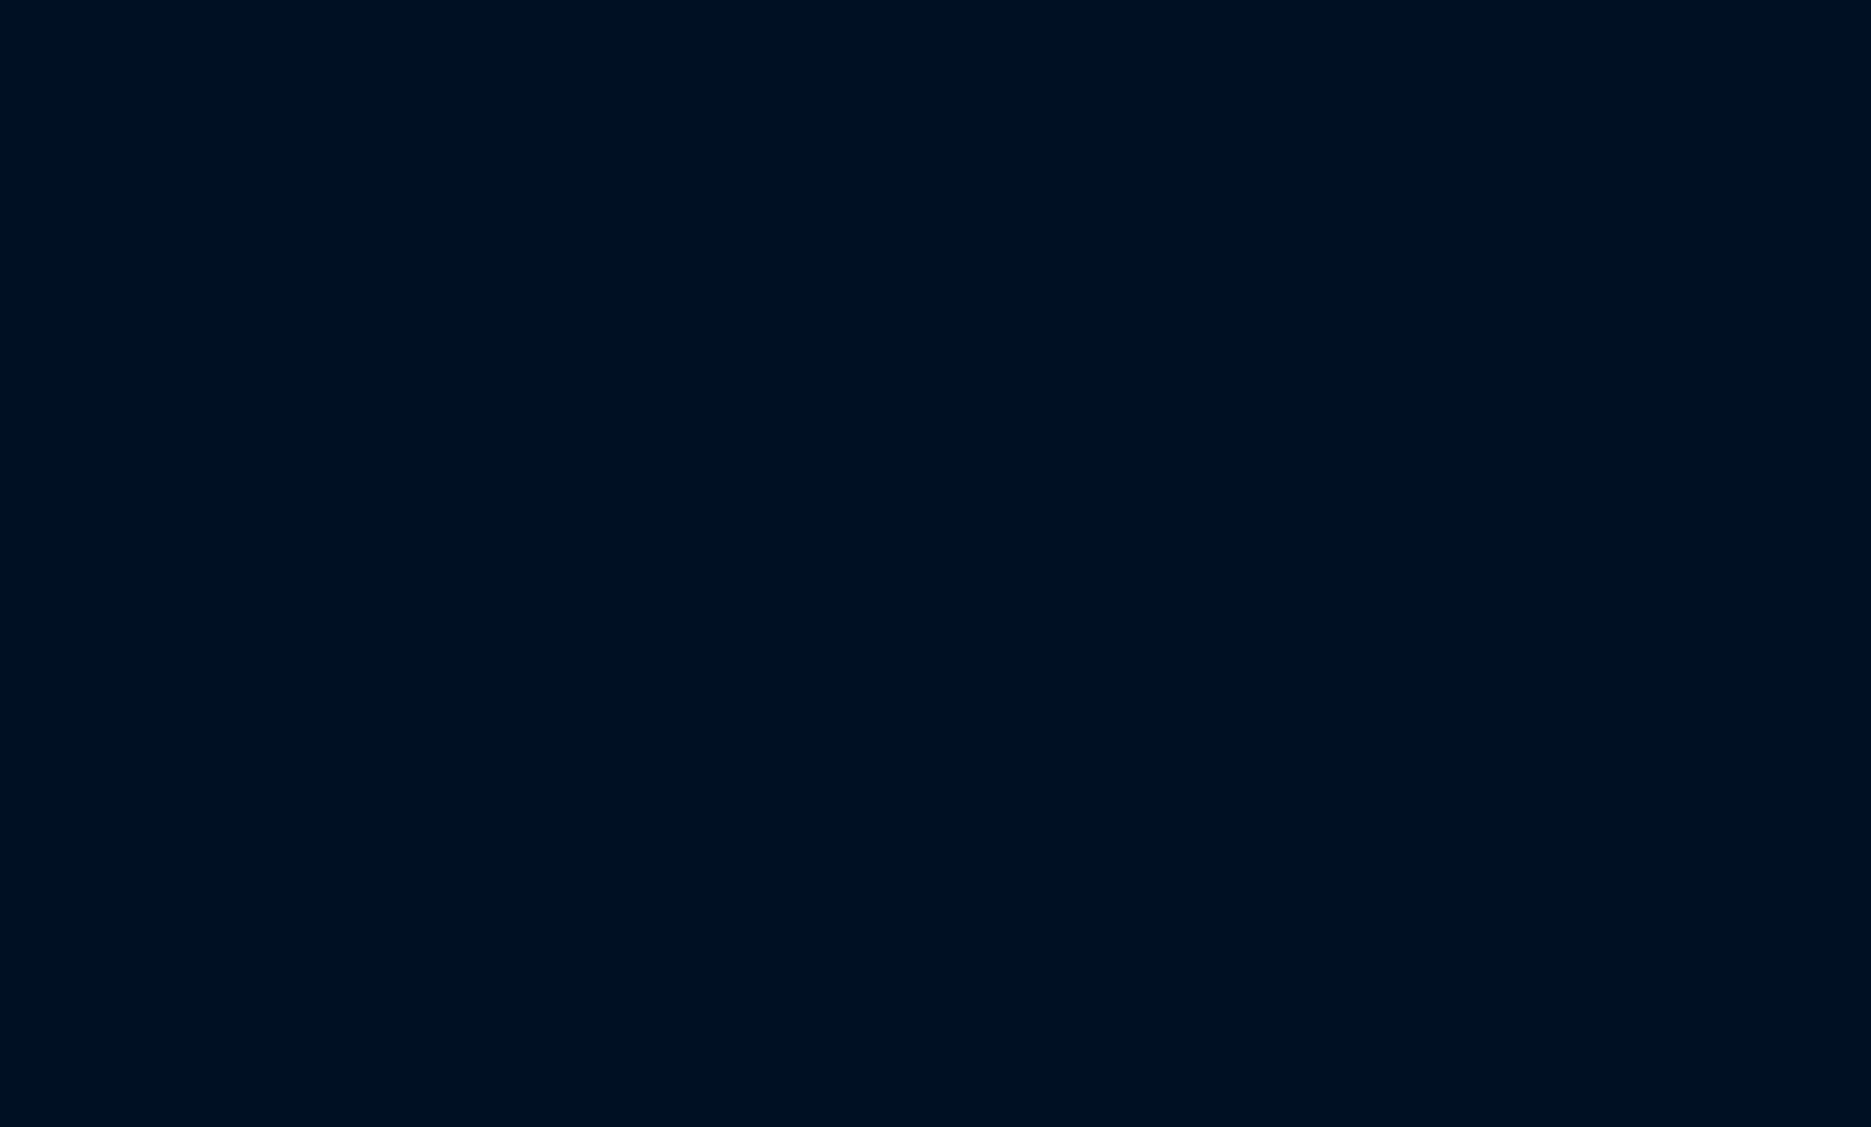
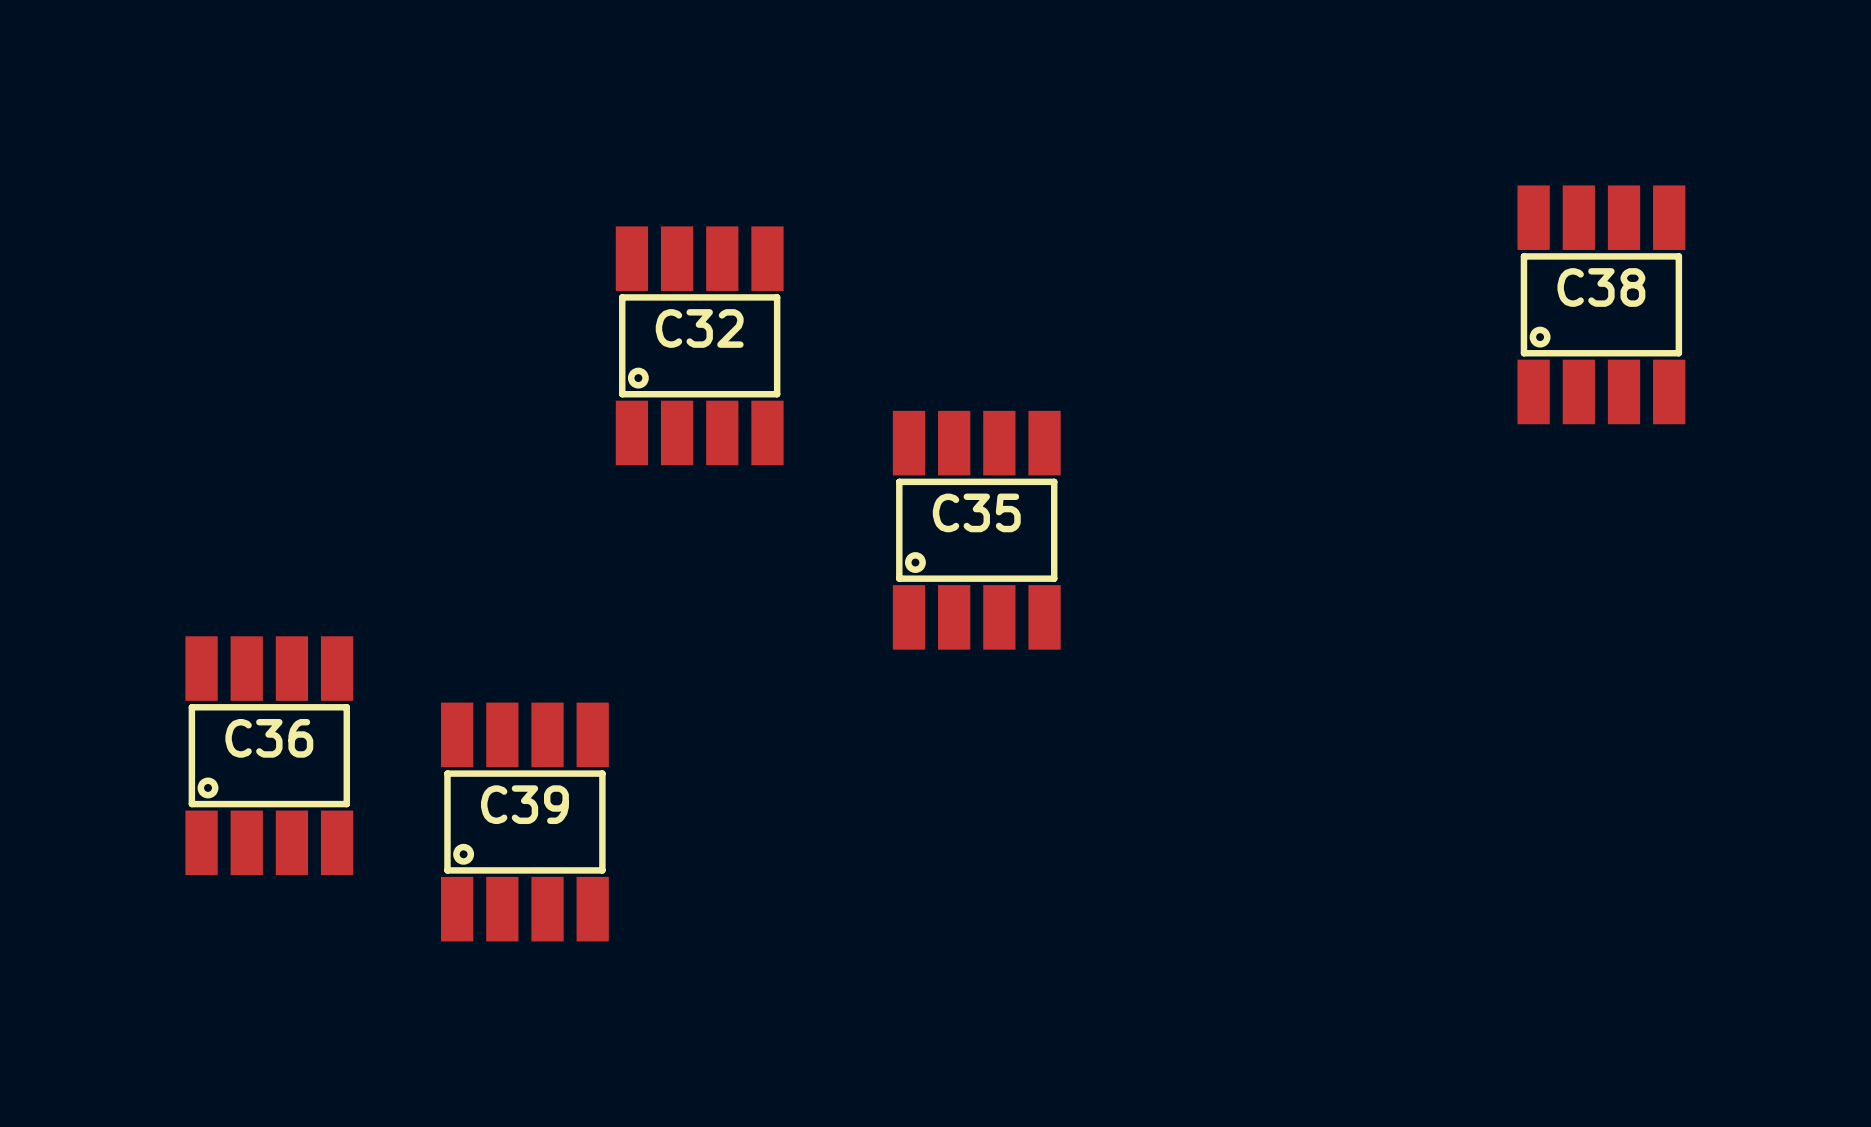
C38: none -> (1601, 304)
C32: none -> (699, 345)
C35: none -> (976, 530)
C36: none -> (269, 755)
C39: none -> (524, 822)

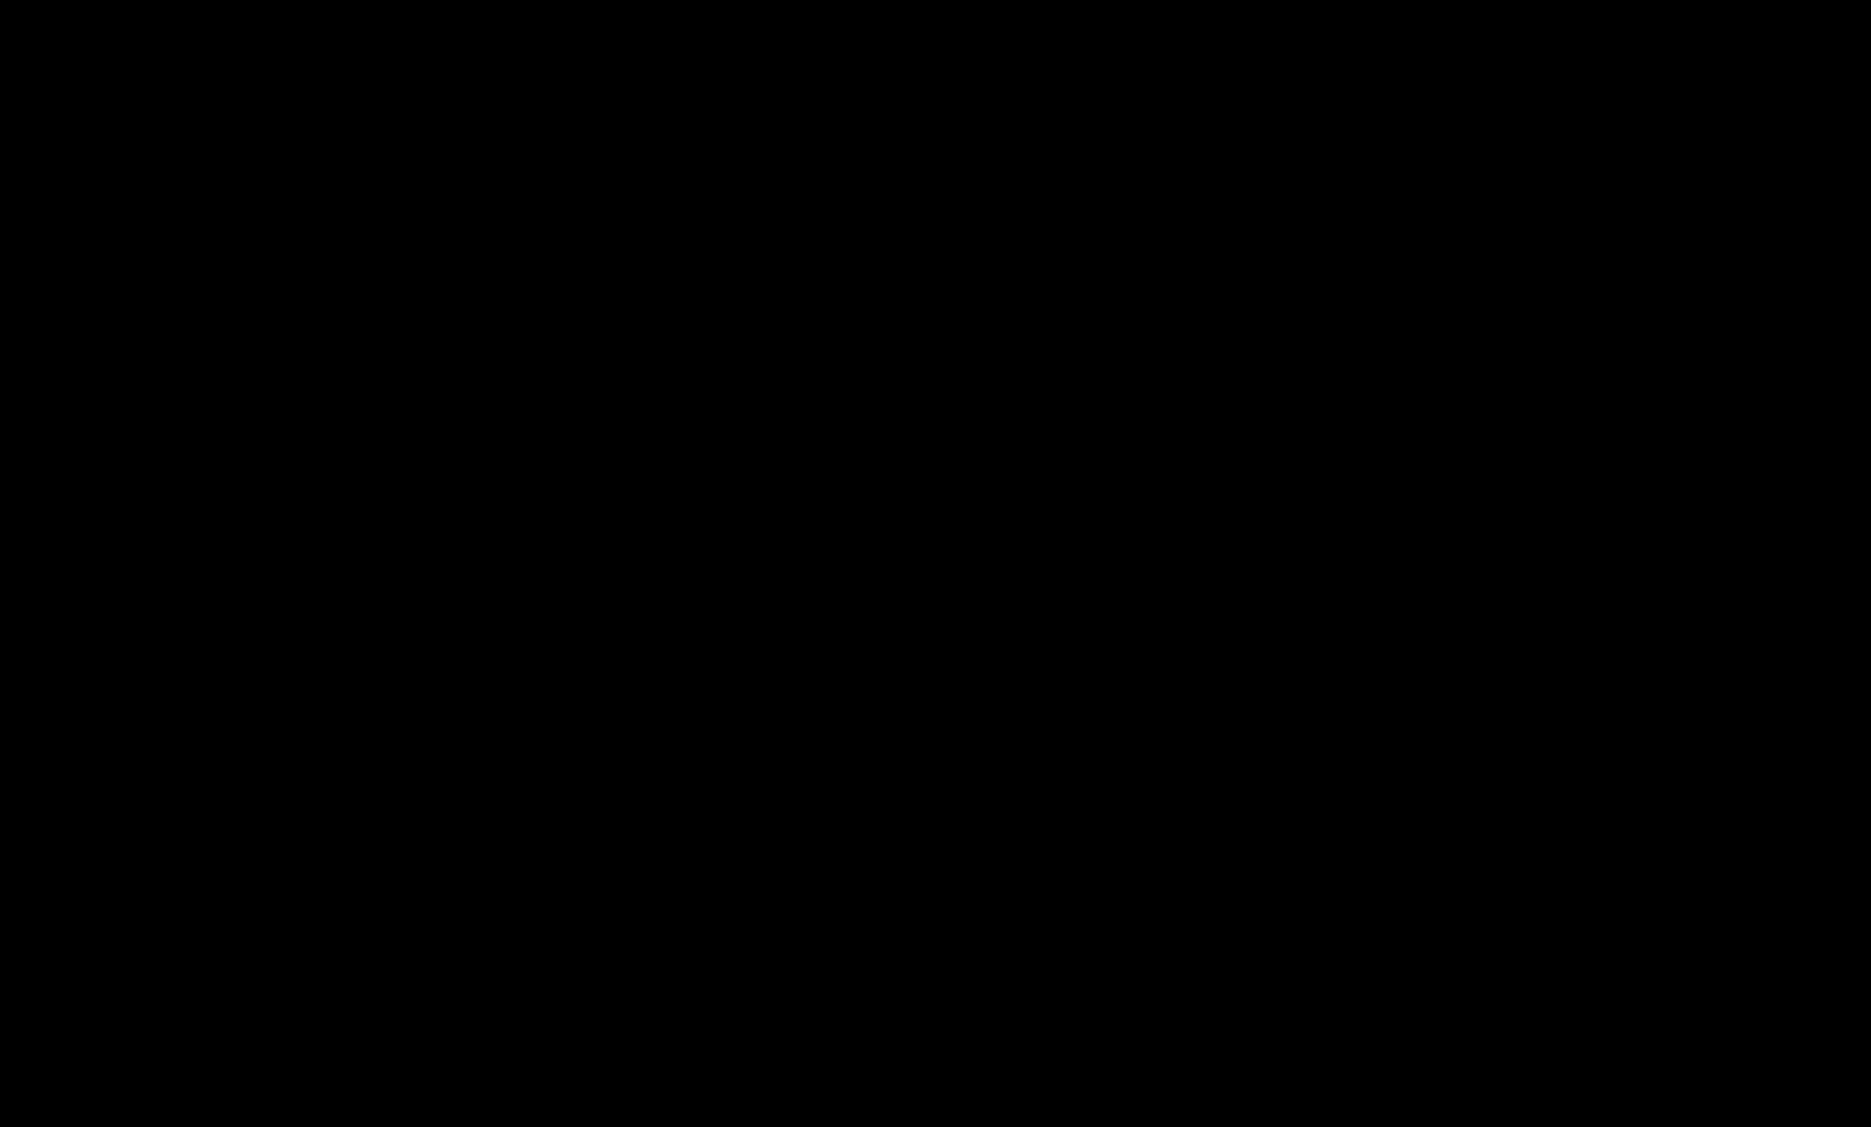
C38: (1601, 304) -> none
C32: (699, 345) -> none
C35: (976, 530) -> none
C36: (269, 755) -> none
C39: (524, 822) -> none

